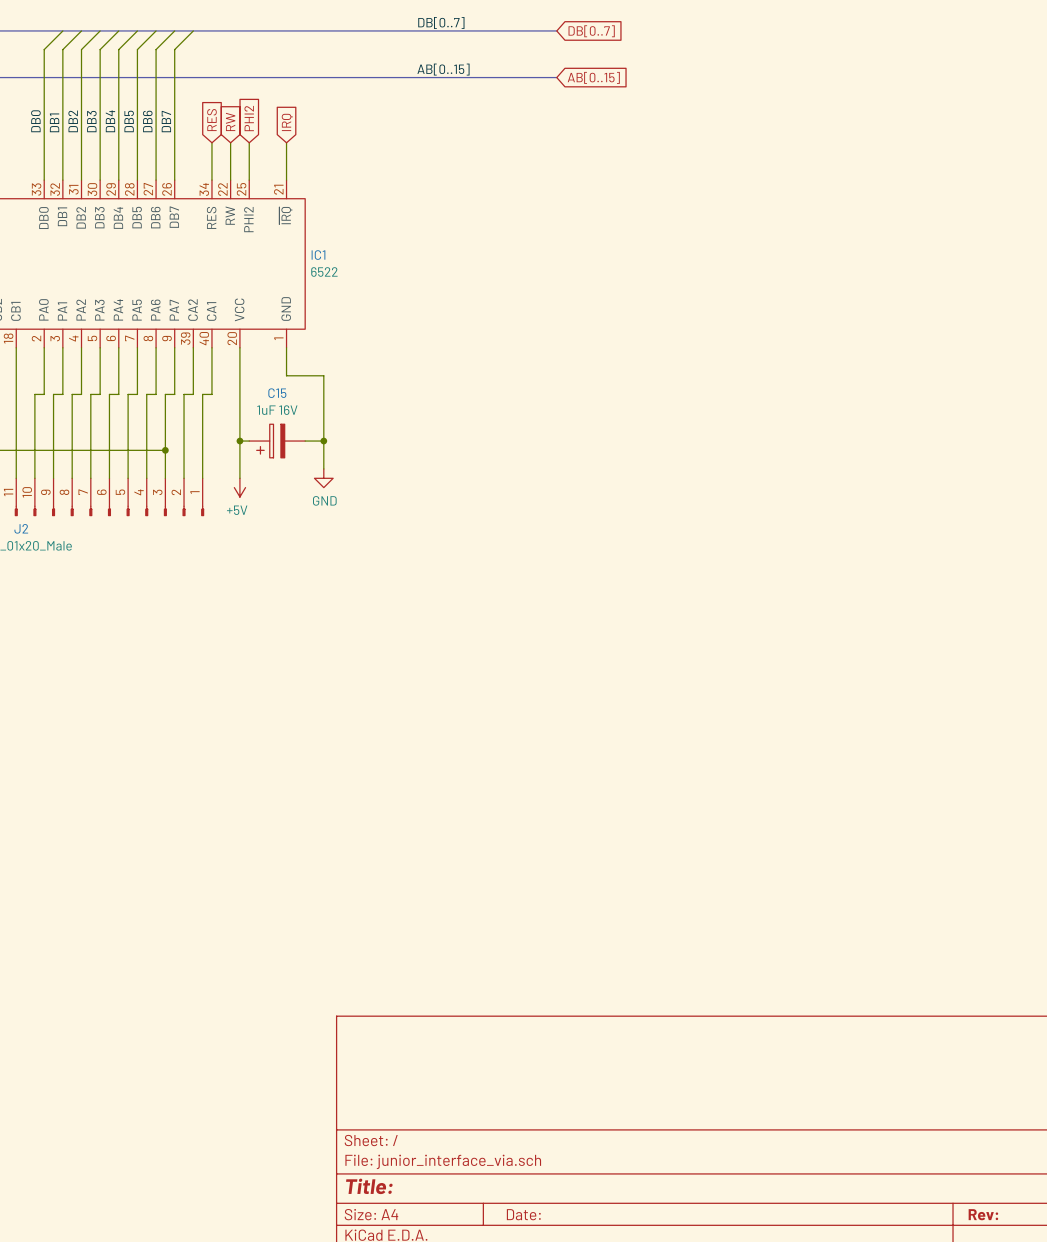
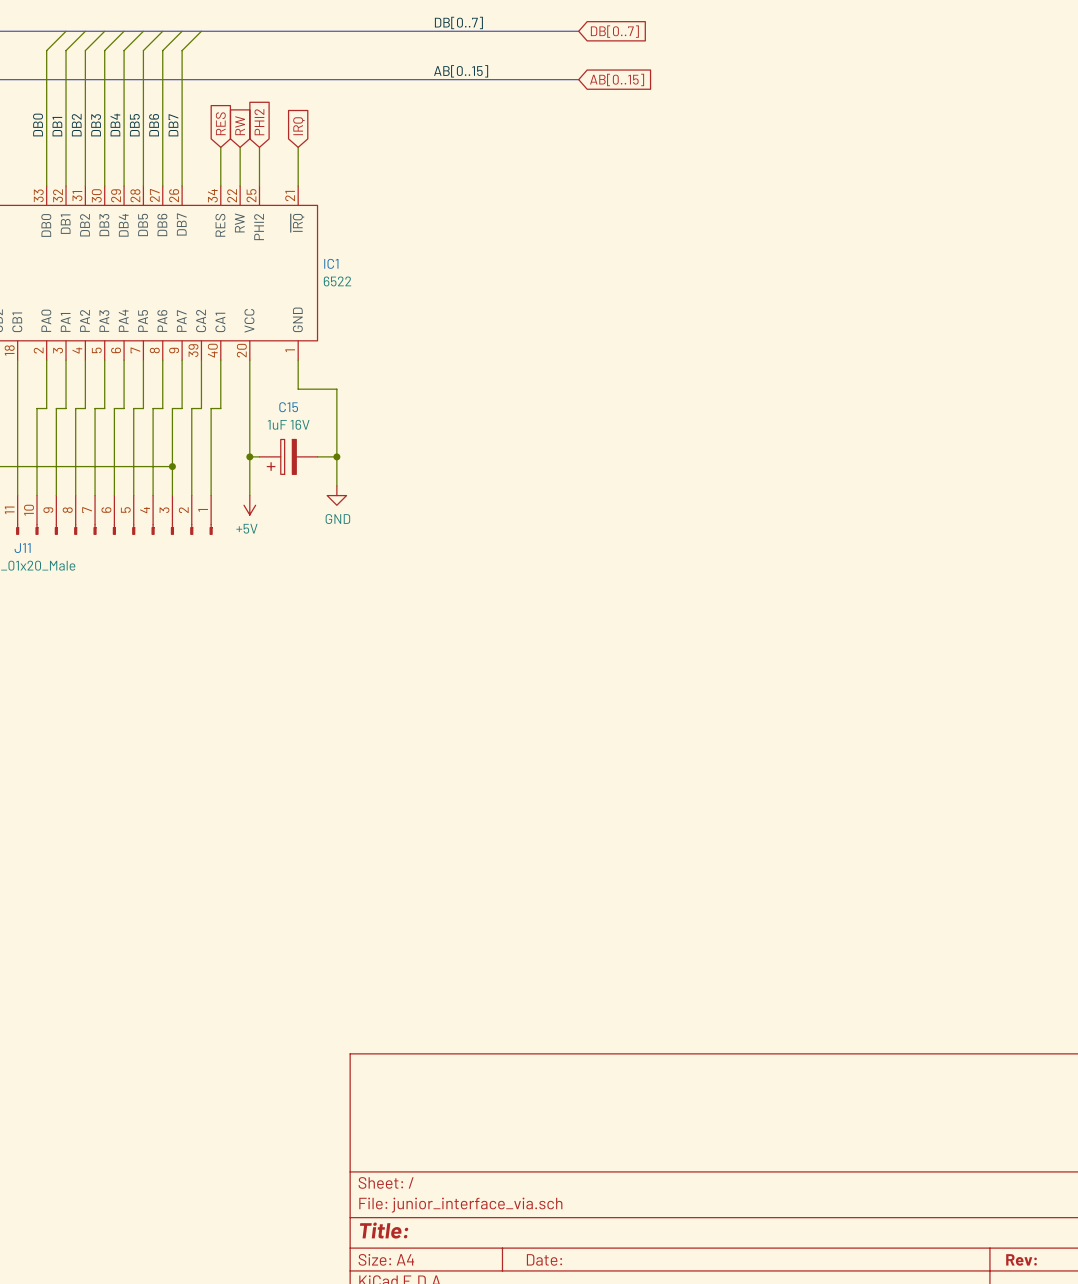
J2 name: J2 (21, 528) -> J11 (22, 548)

